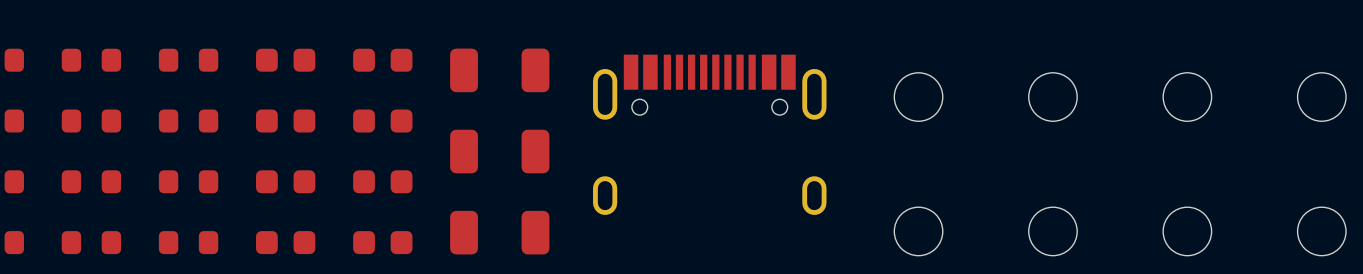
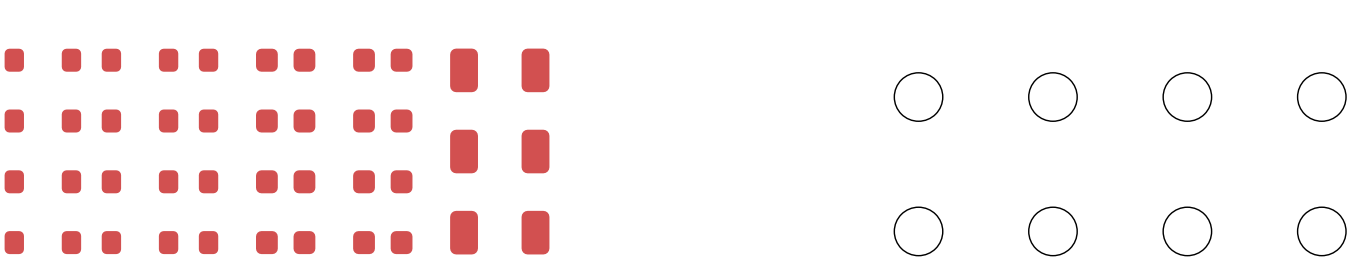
part: (709, 134) -> none

